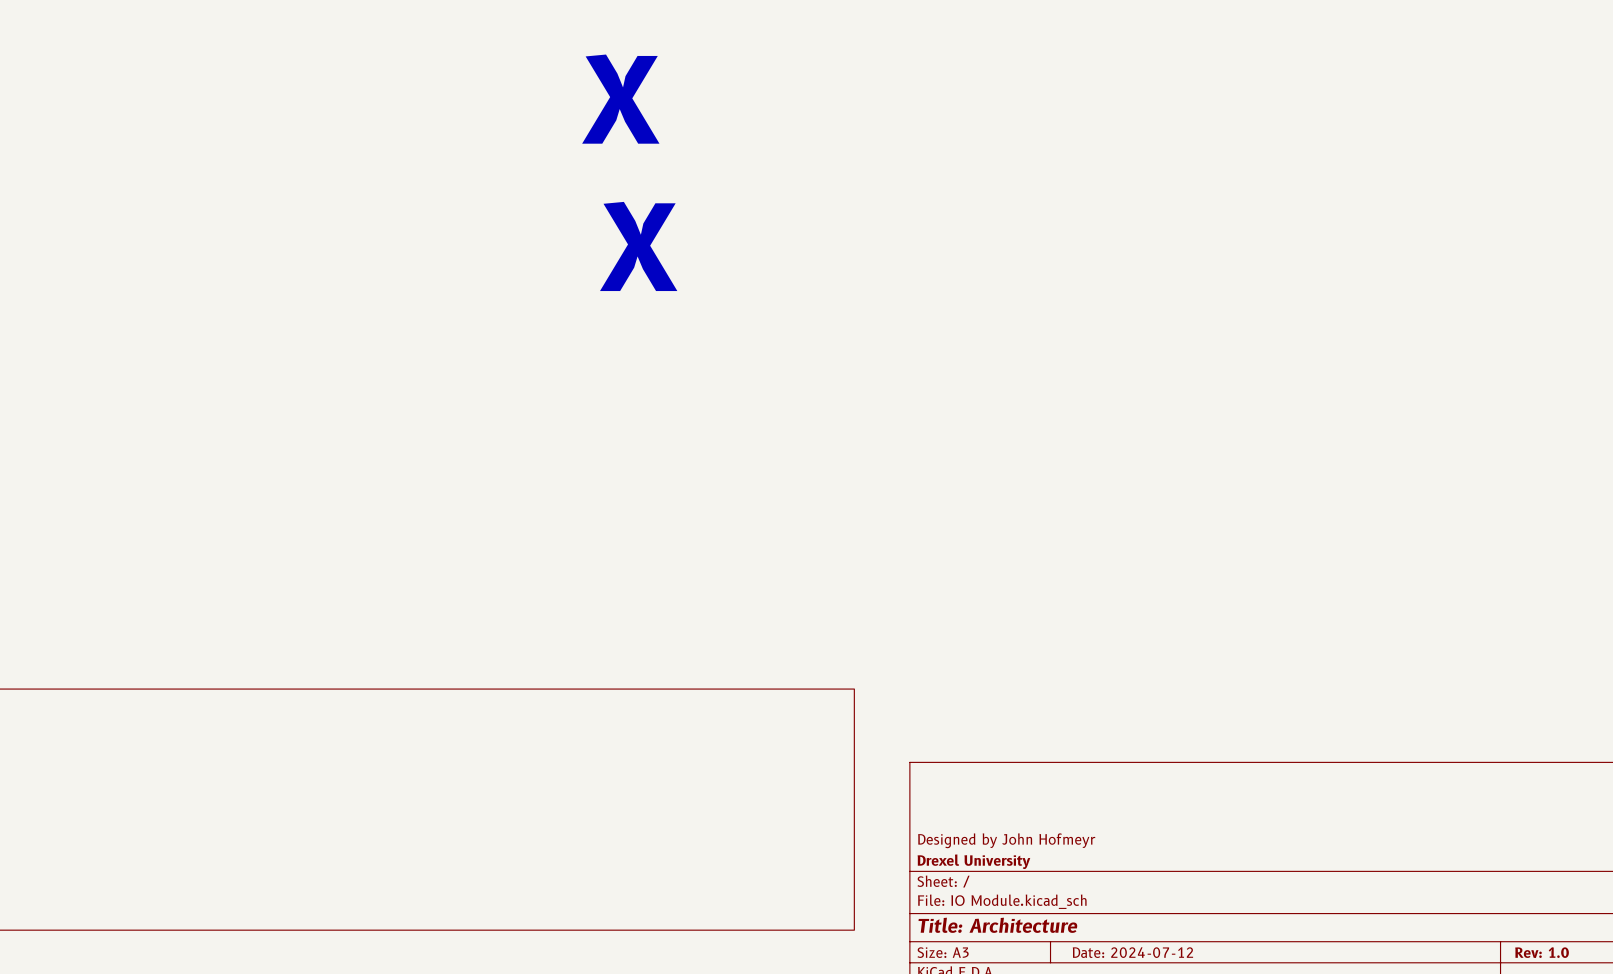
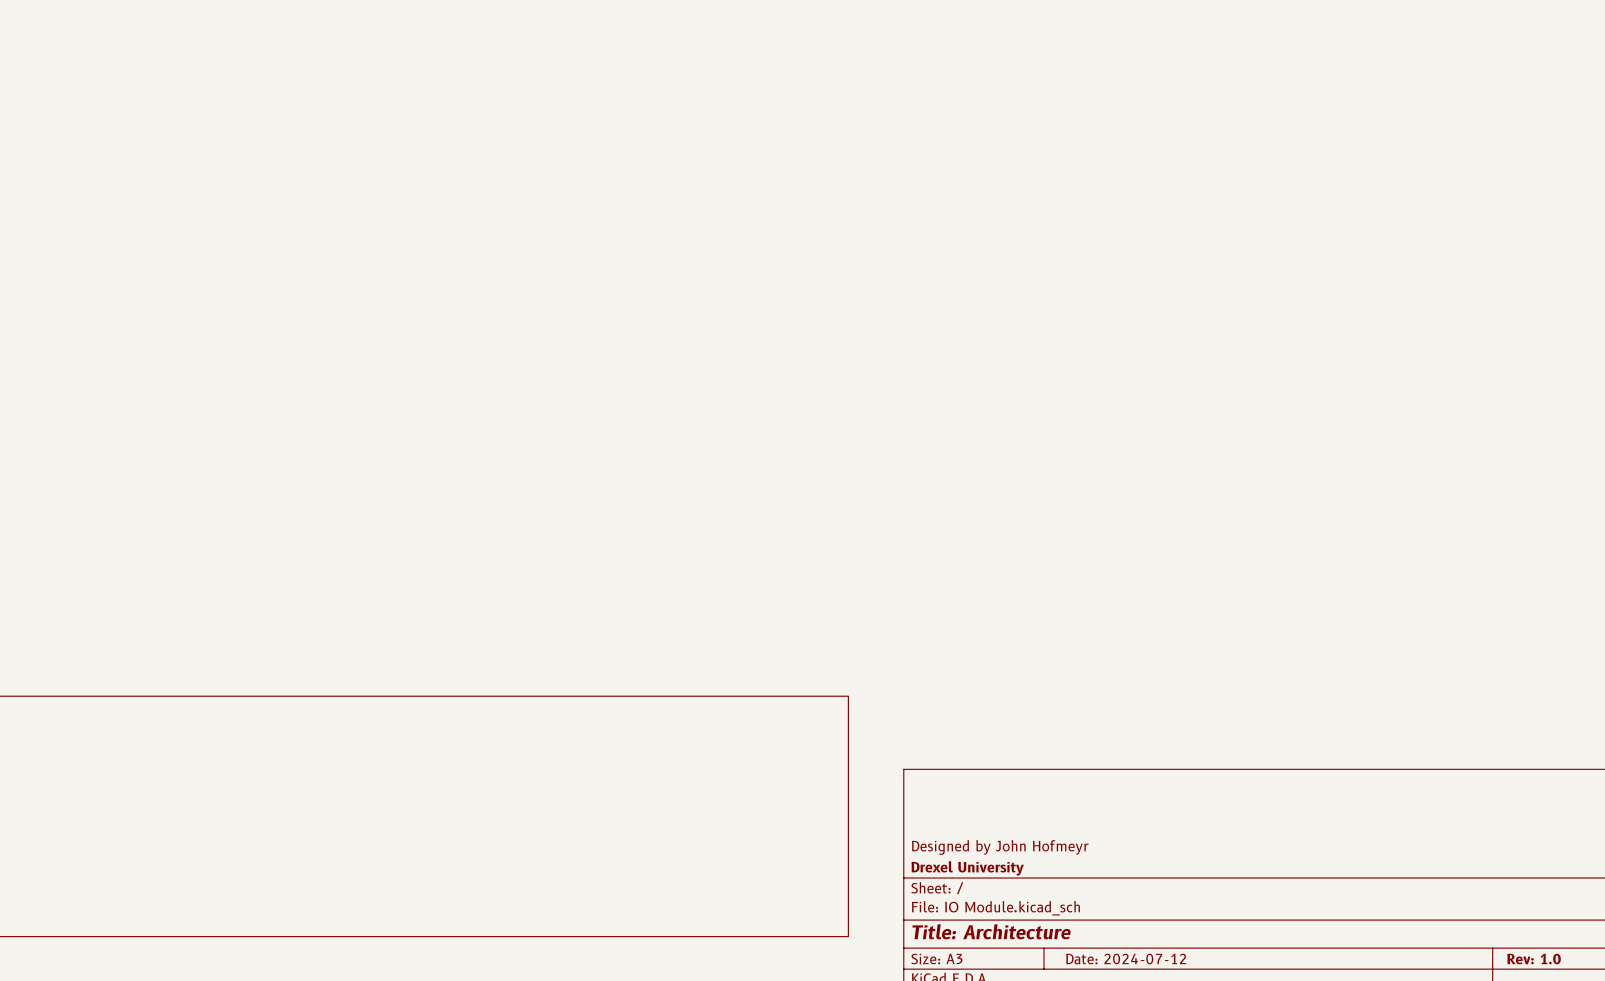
text: X (620, 99) -> none
text: X (638, 246) -> none

